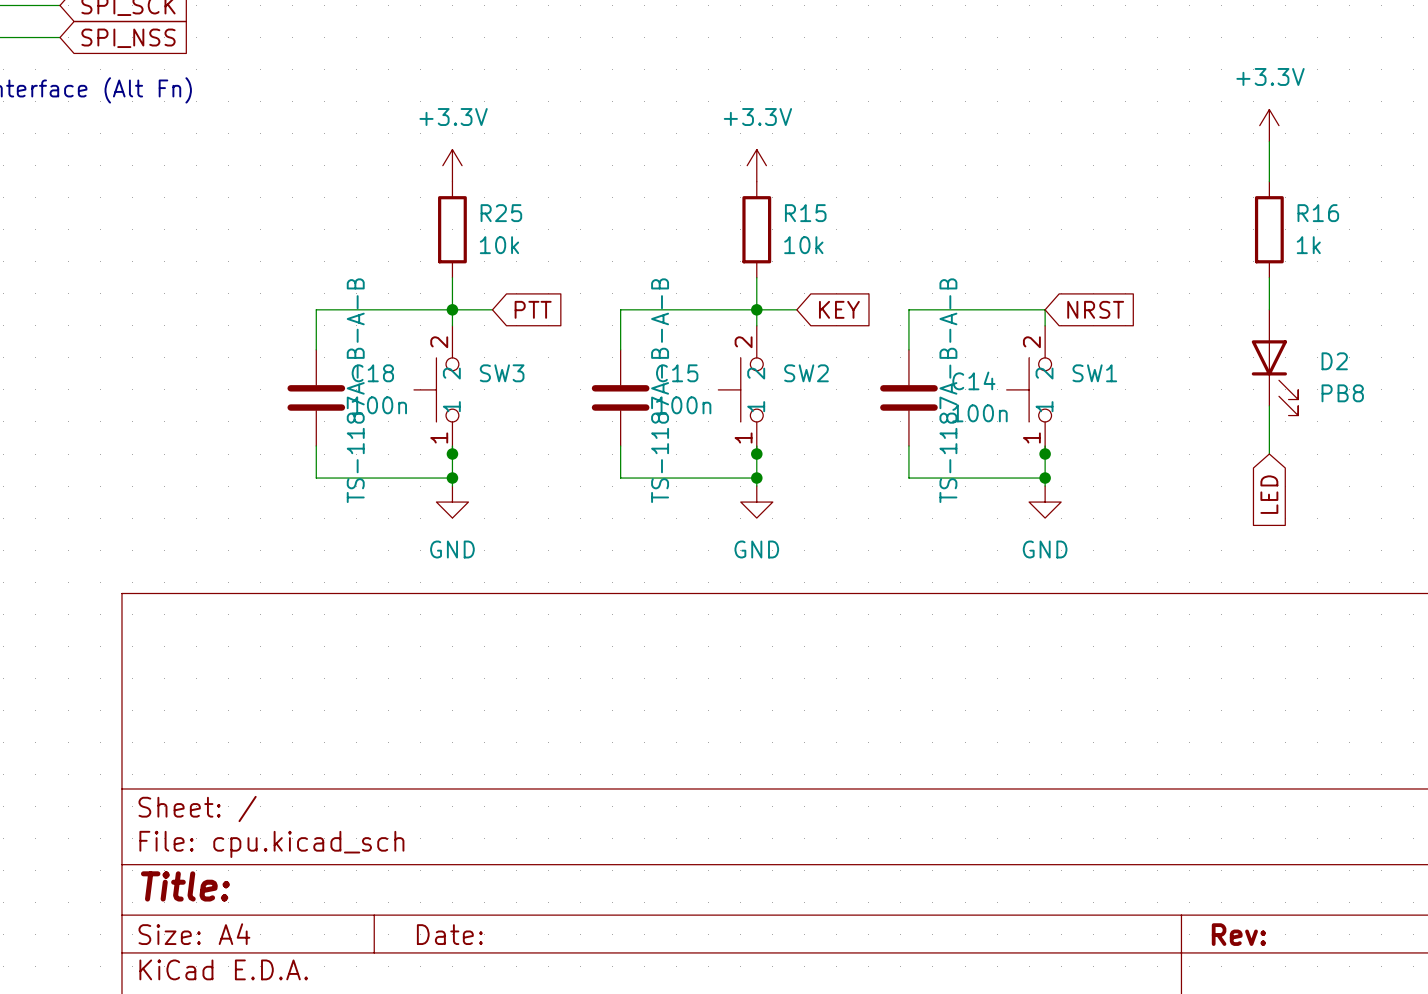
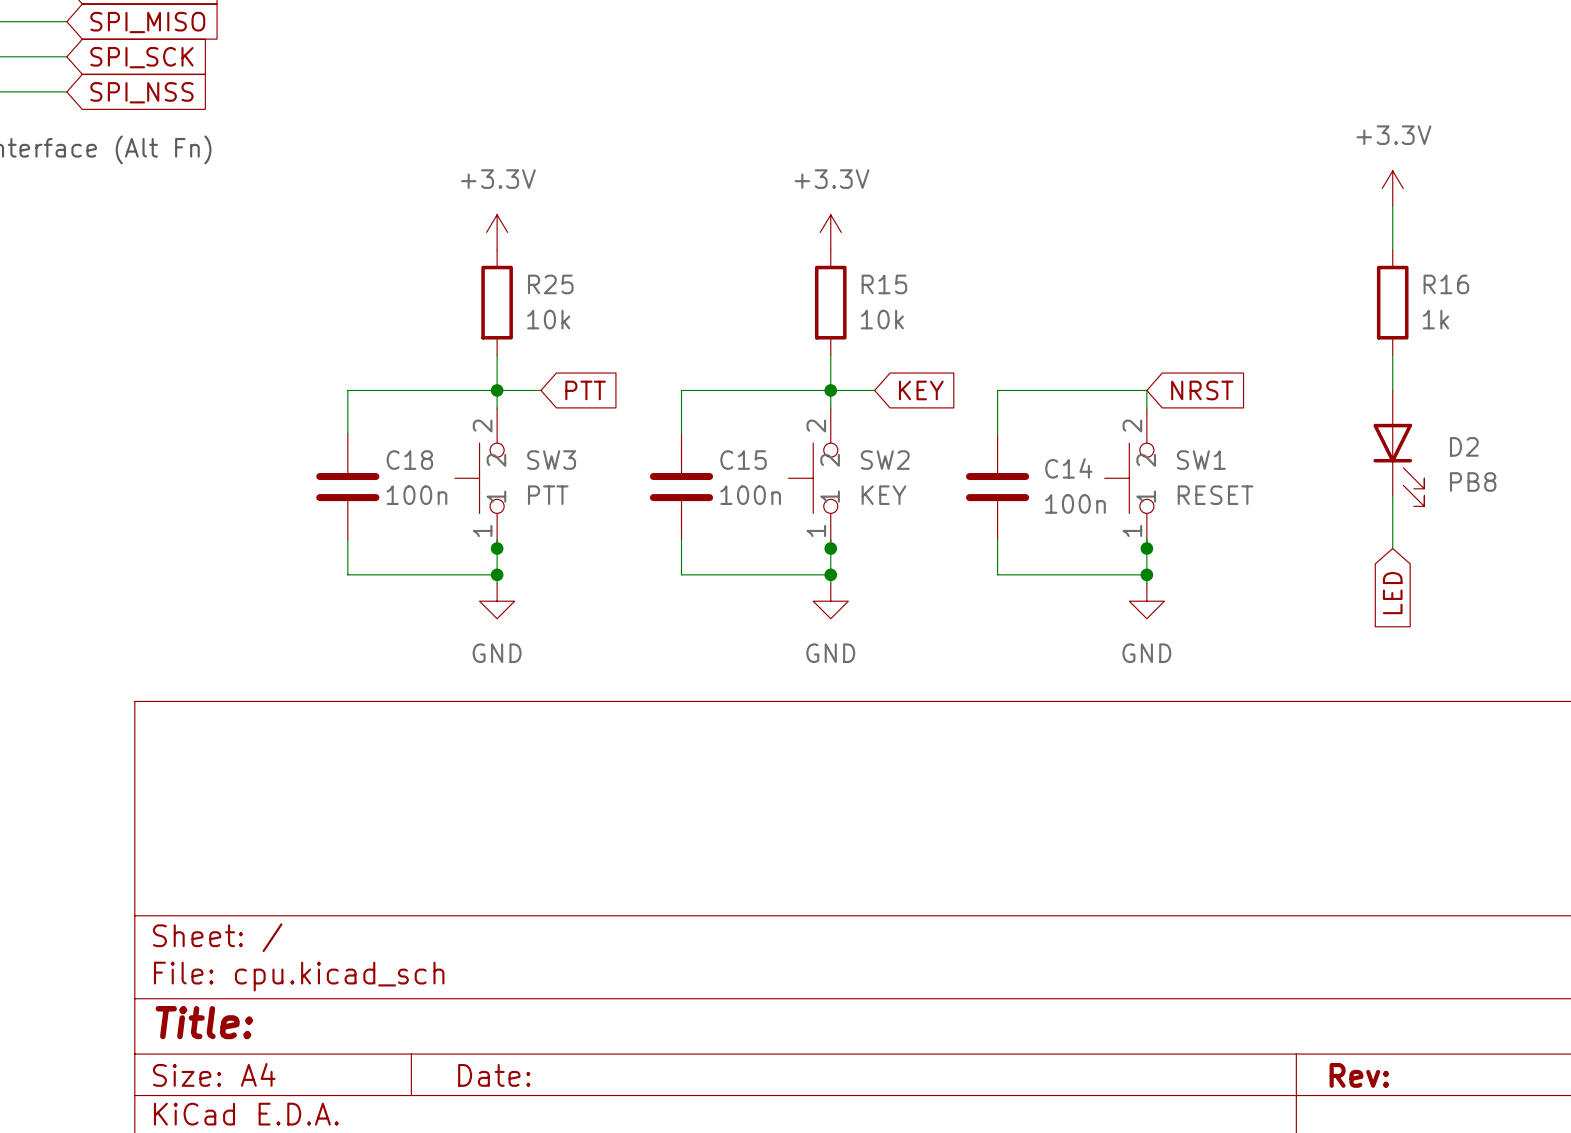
SW3 value: TS-1187A-B-A-B (355, 390) -> PTT (548, 495)
SW2 value: TS-1187A-B-A-B (660, 390) -> KEY (884, 495)
SW1 value: TS-1187A-B-A-B (948, 390) -> RESET (1215, 495)

